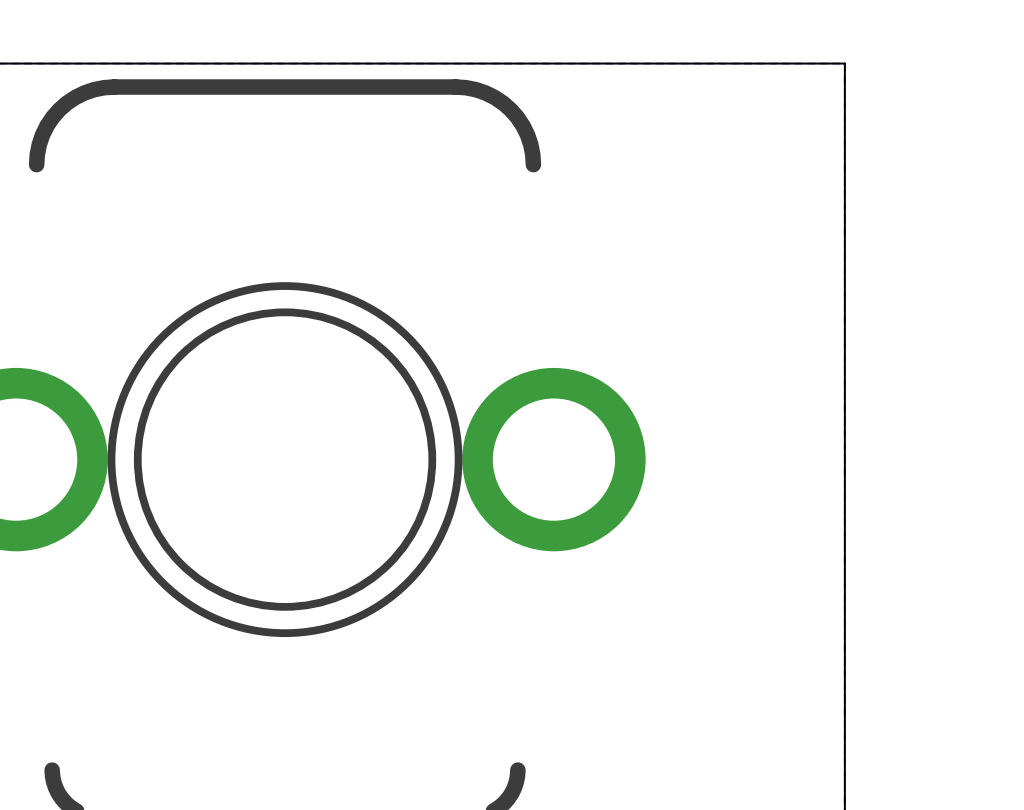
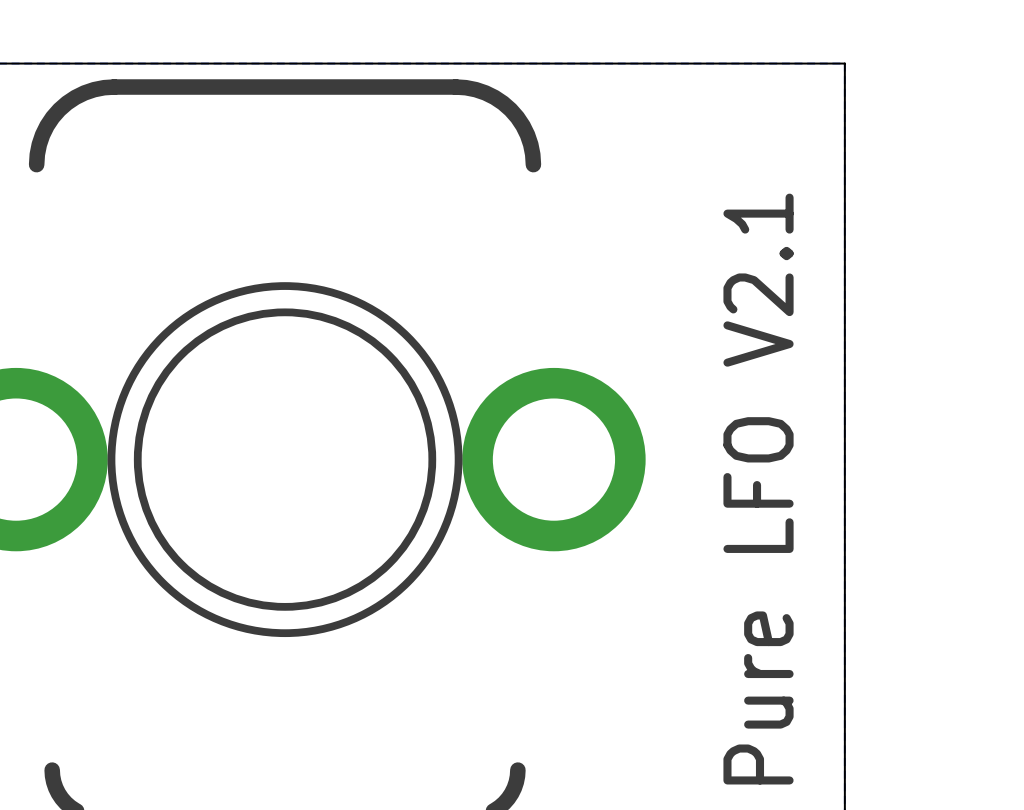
text: none -> Pure LFO V2.1 (758, 489)

